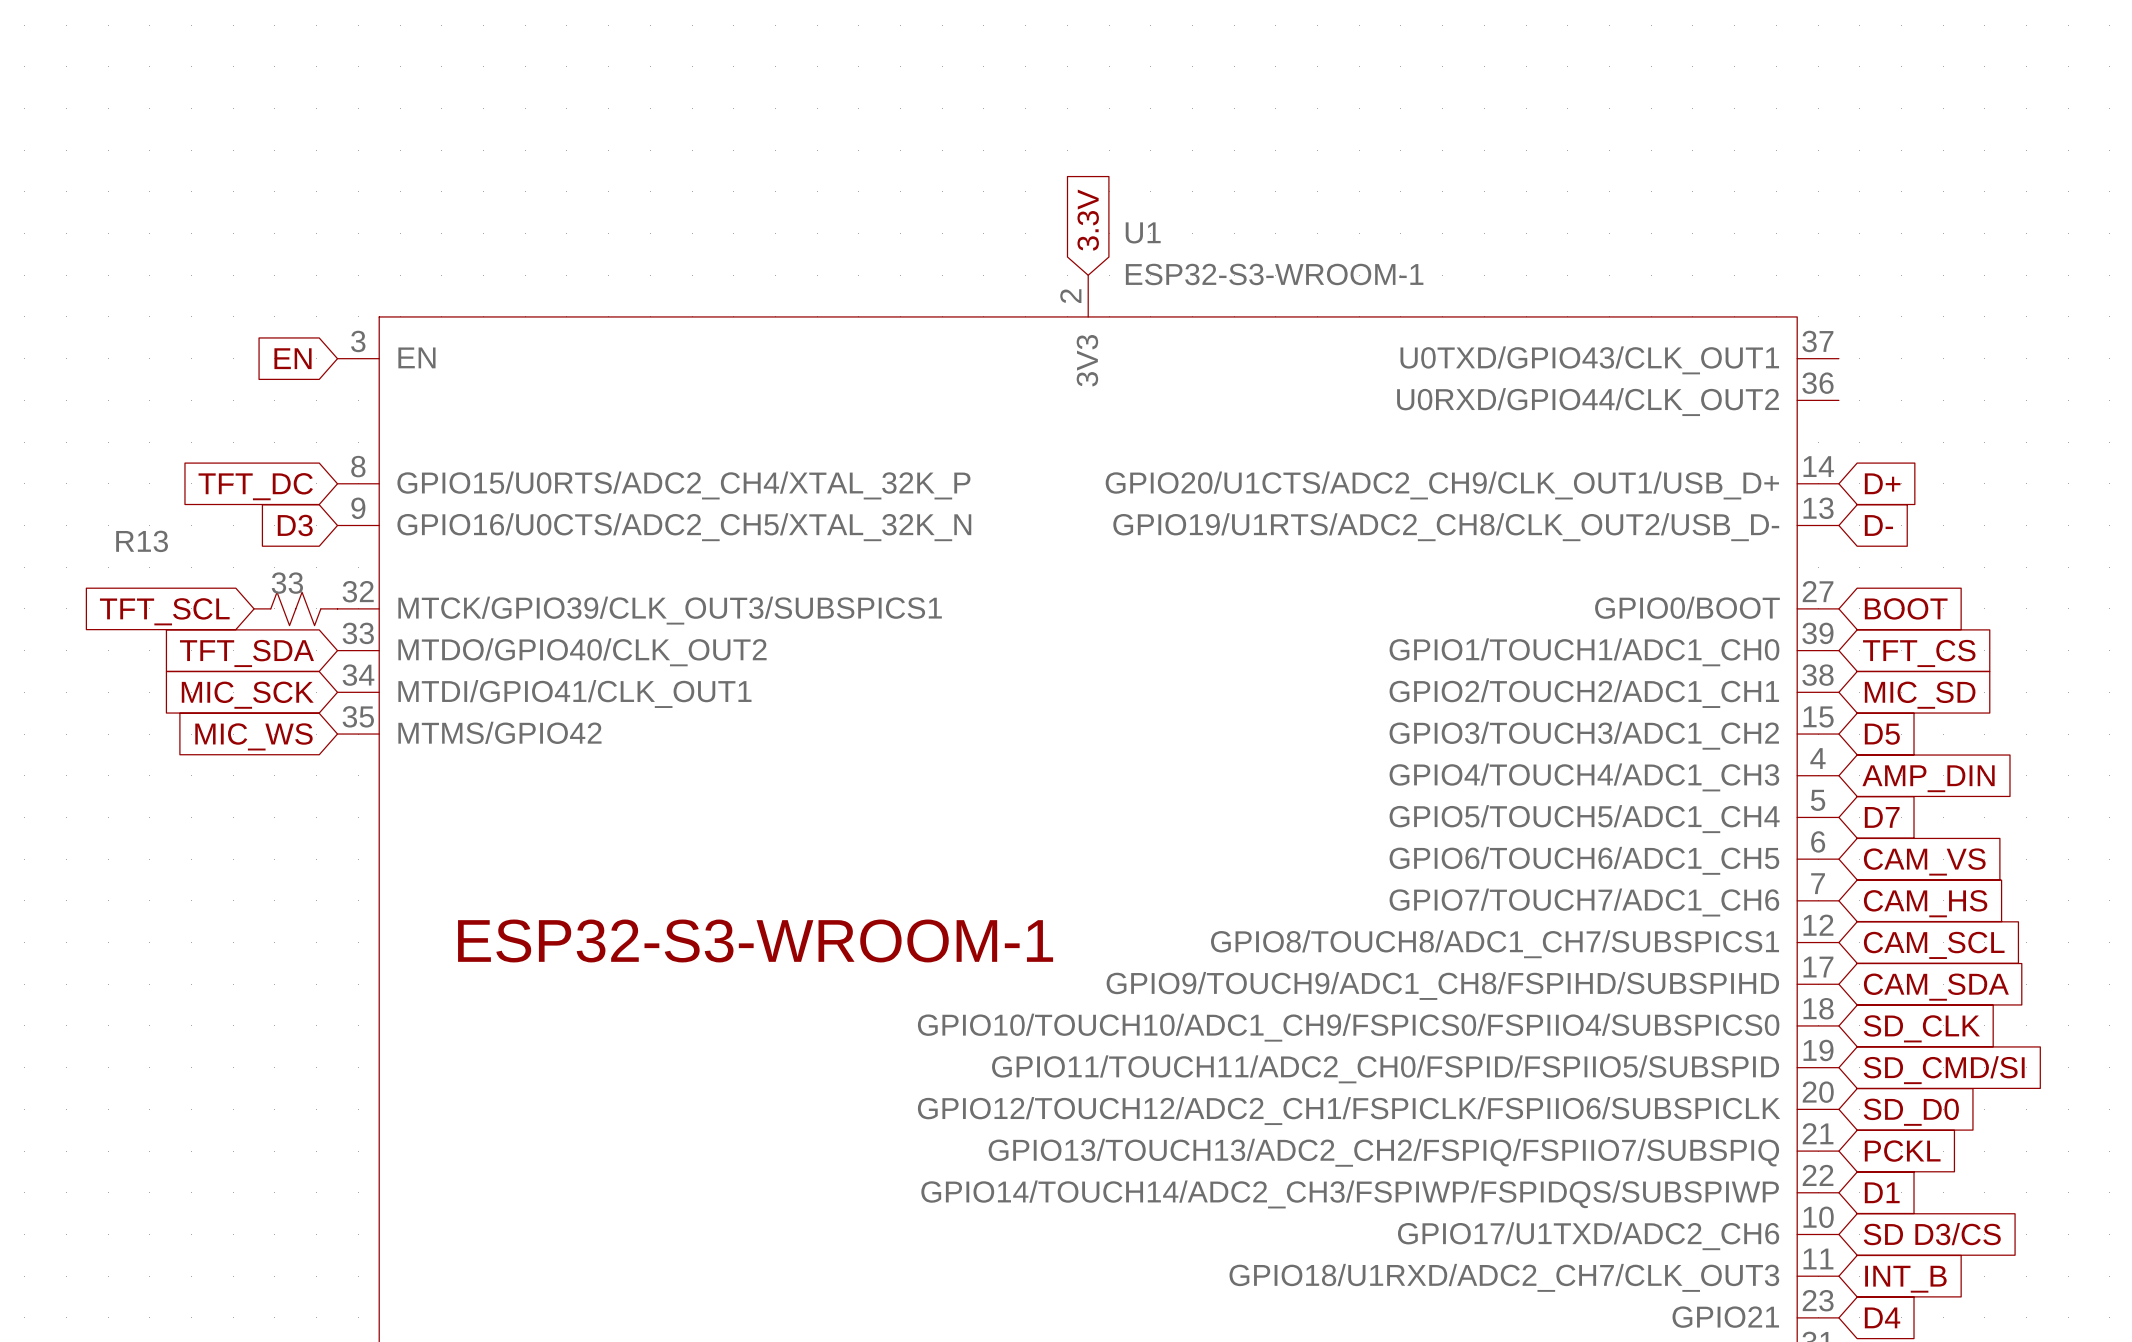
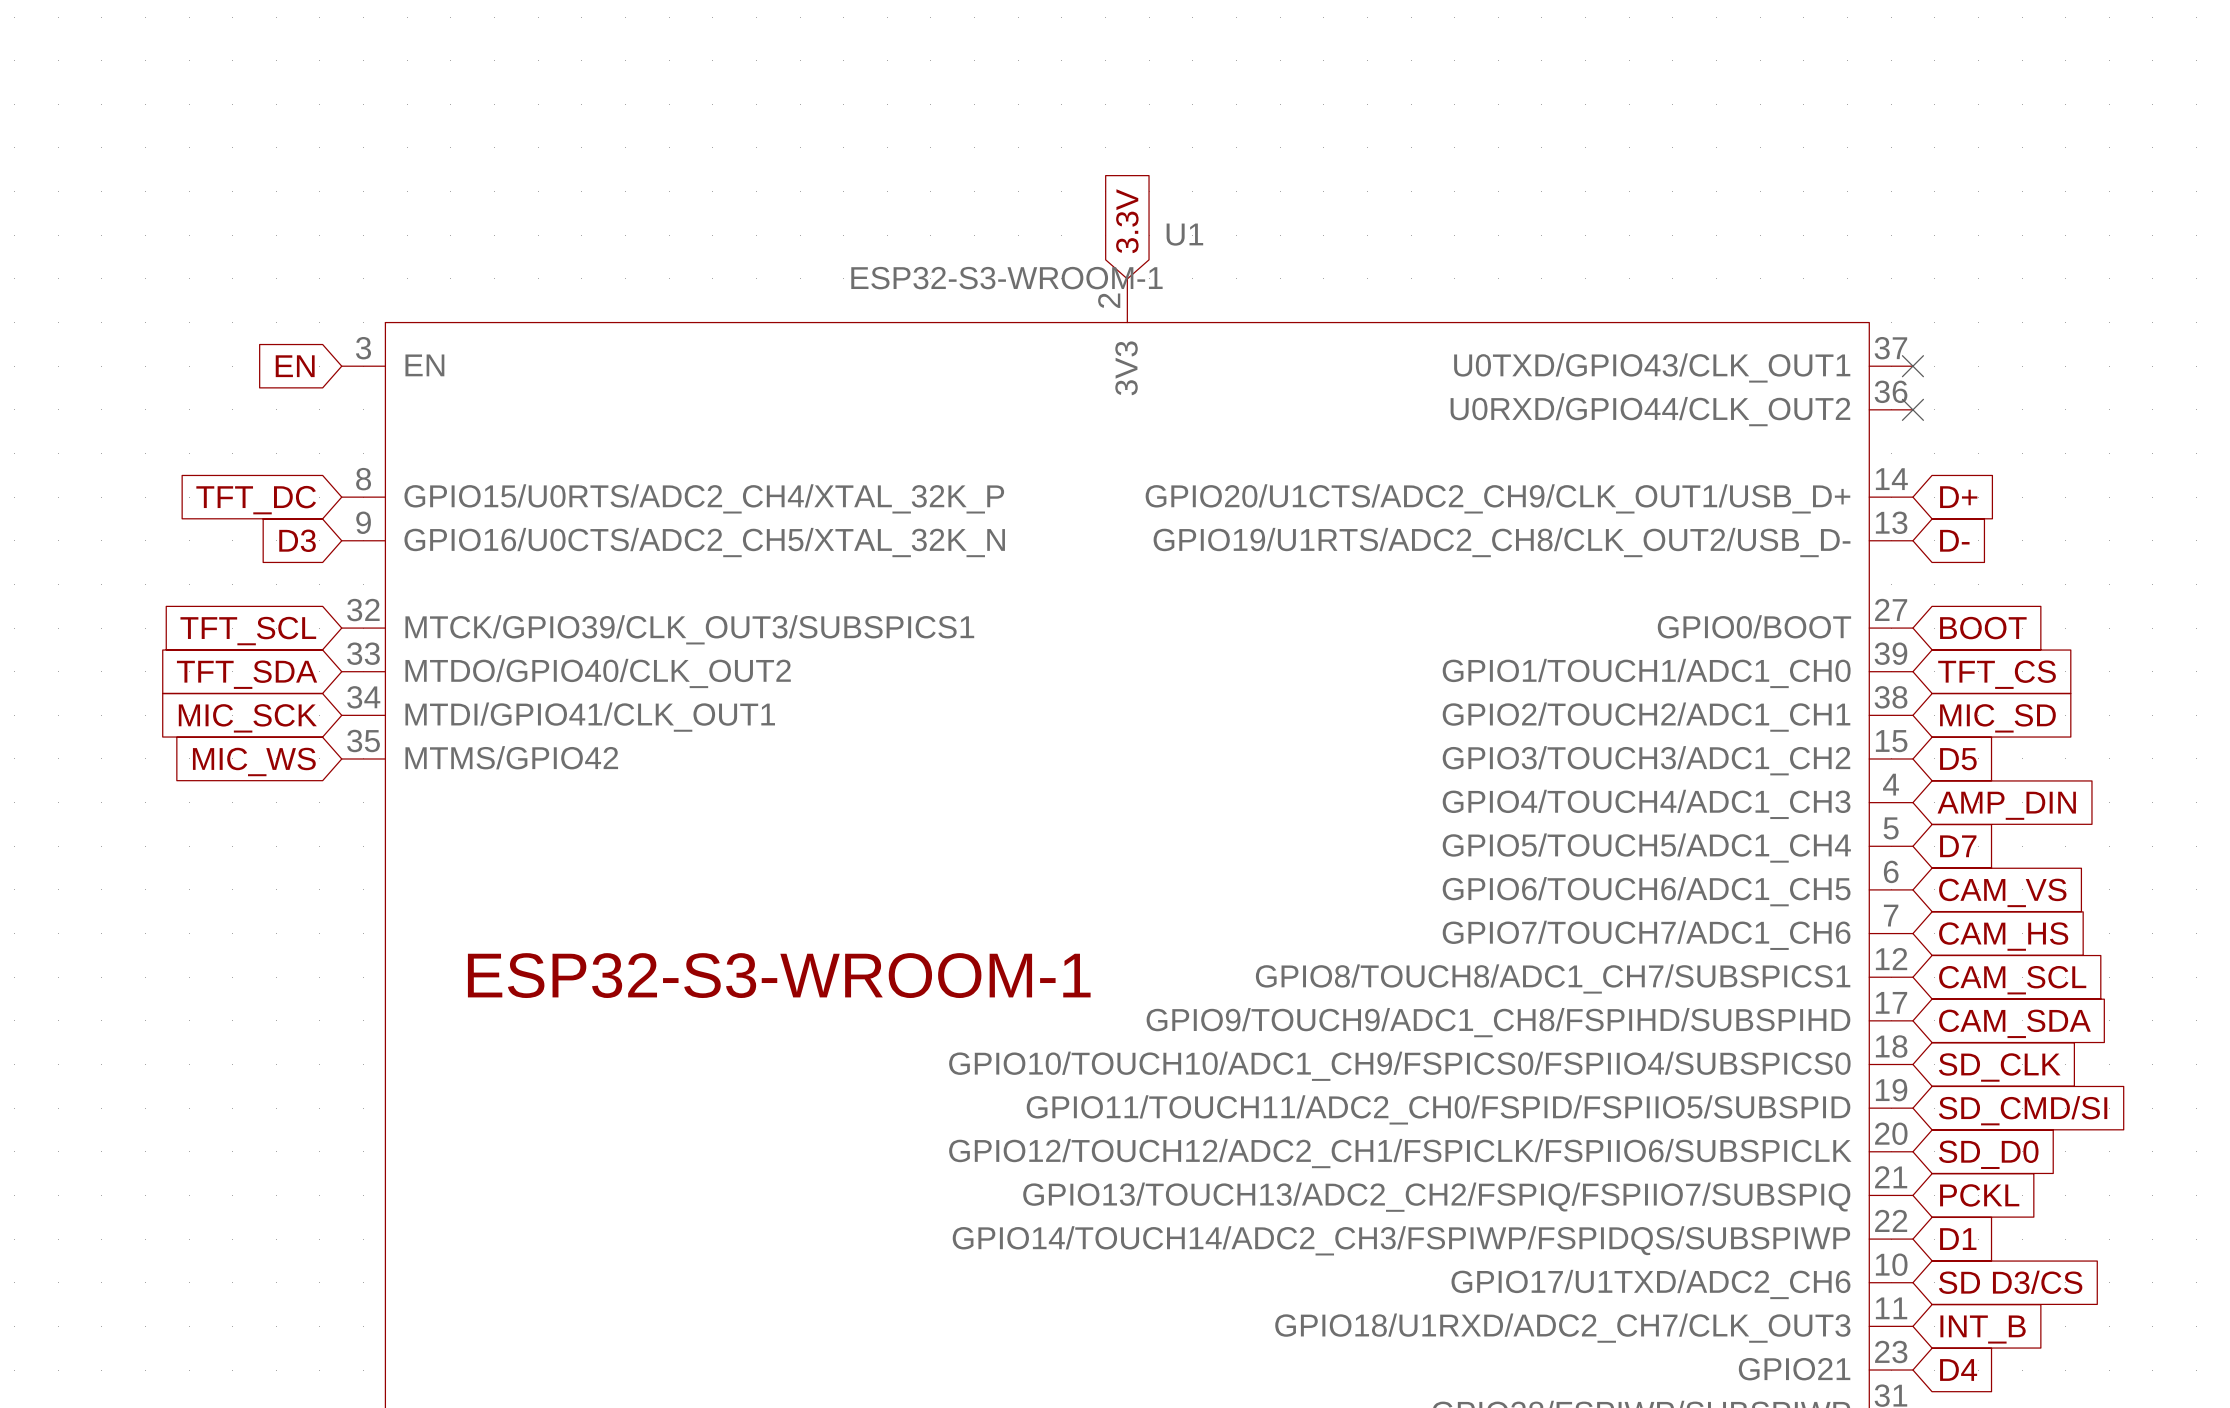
U1 value position: ESP32-S3-WROOM-1 (1274, 274) -> ESP32-S3-WROOM-1 (1006, 278)
no-connect mark: none -> (1912, 366)
no-connect mark: none -> (1912, 409)
R13: 33 (295, 608) -> none
global label position: TFT_SCL (164, 611) -> TFT_SCL (248, 631)

